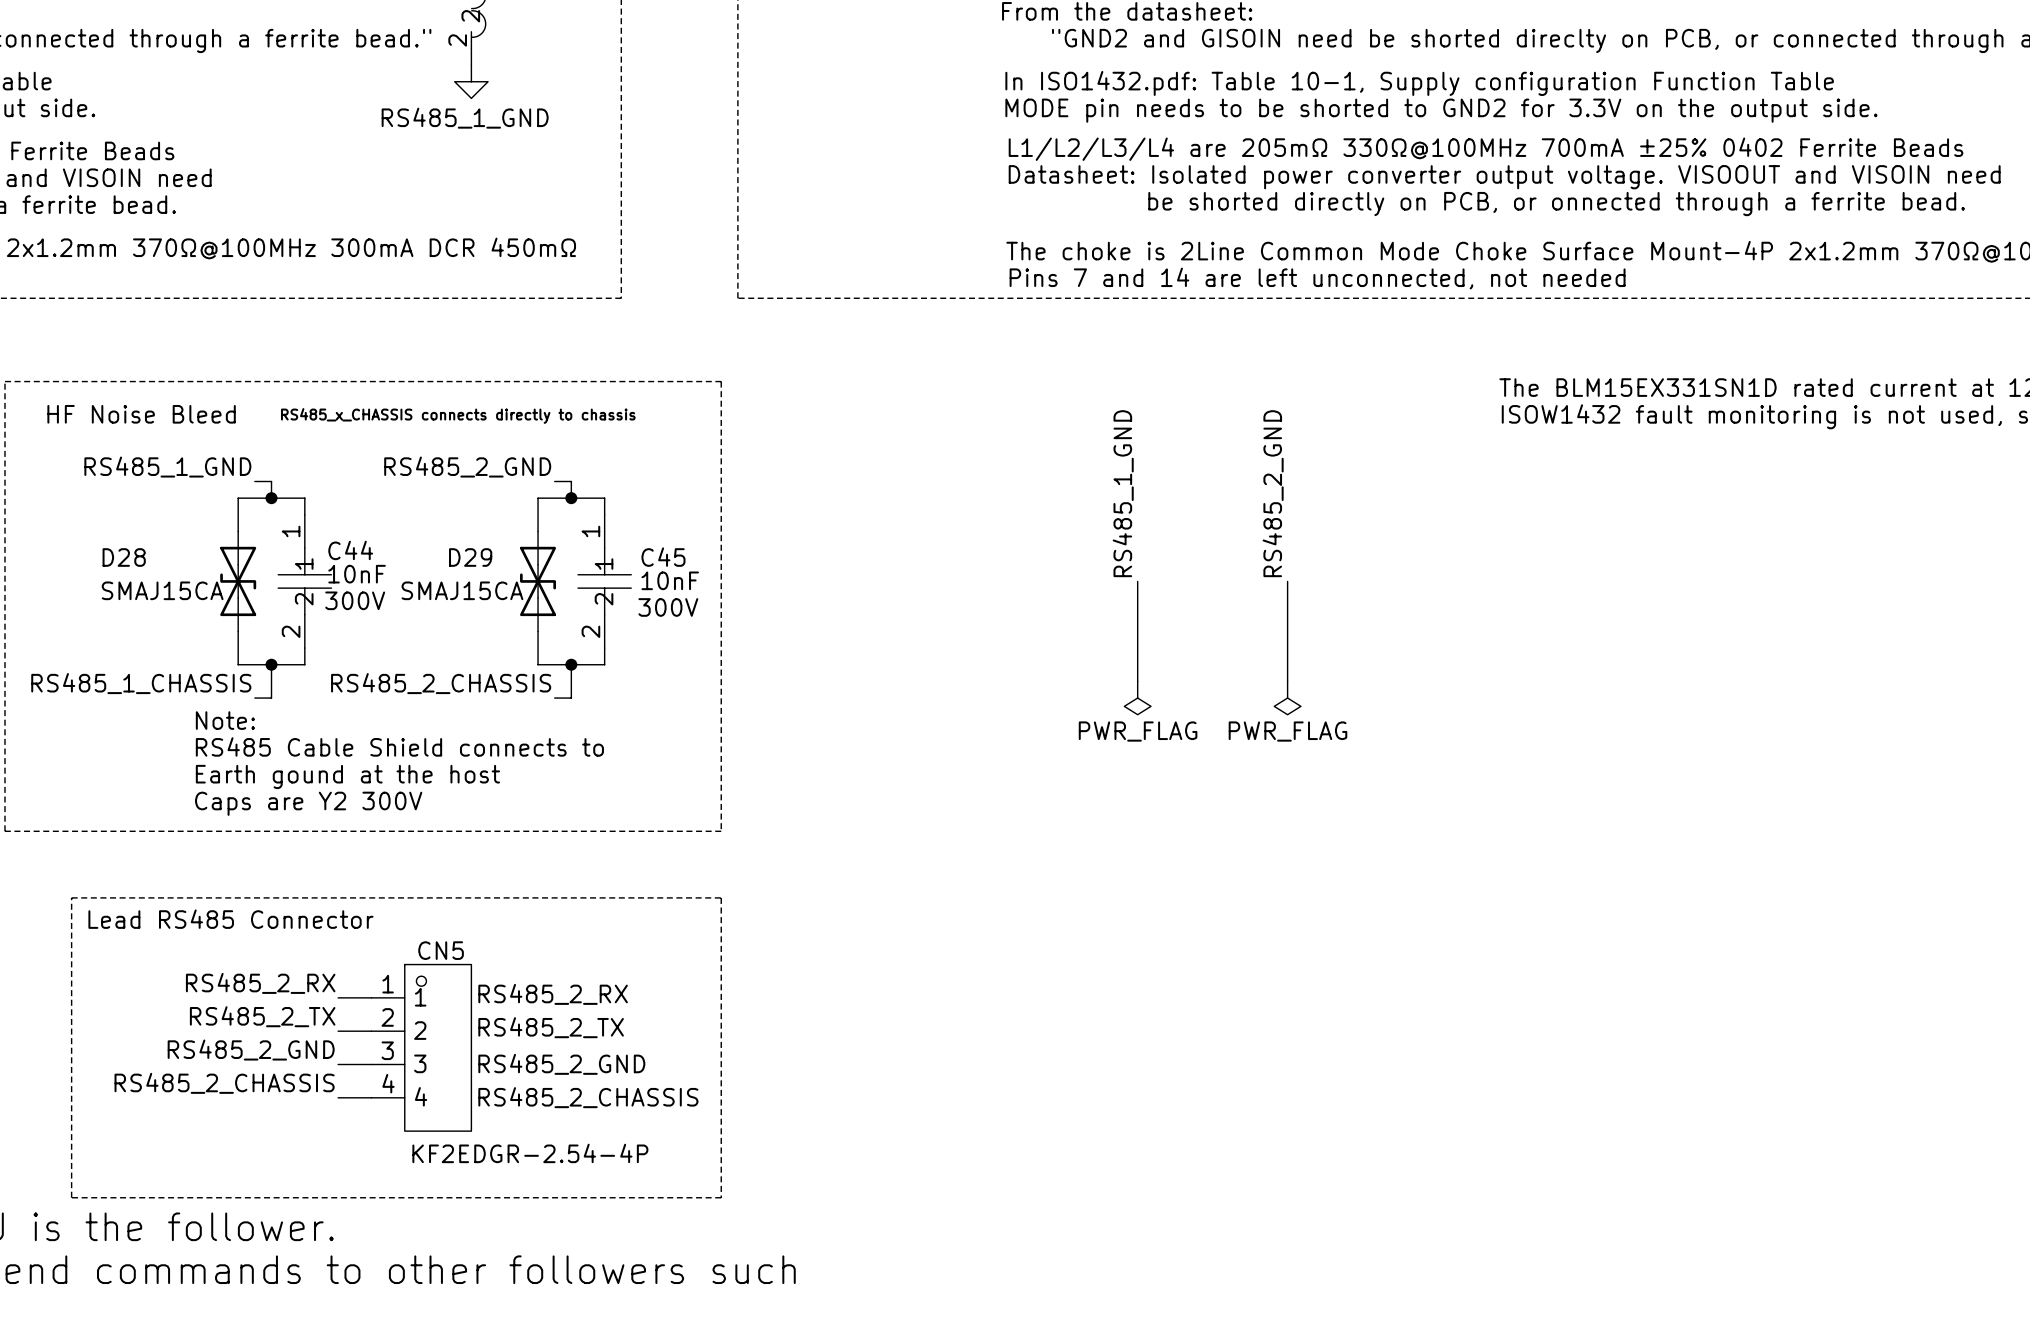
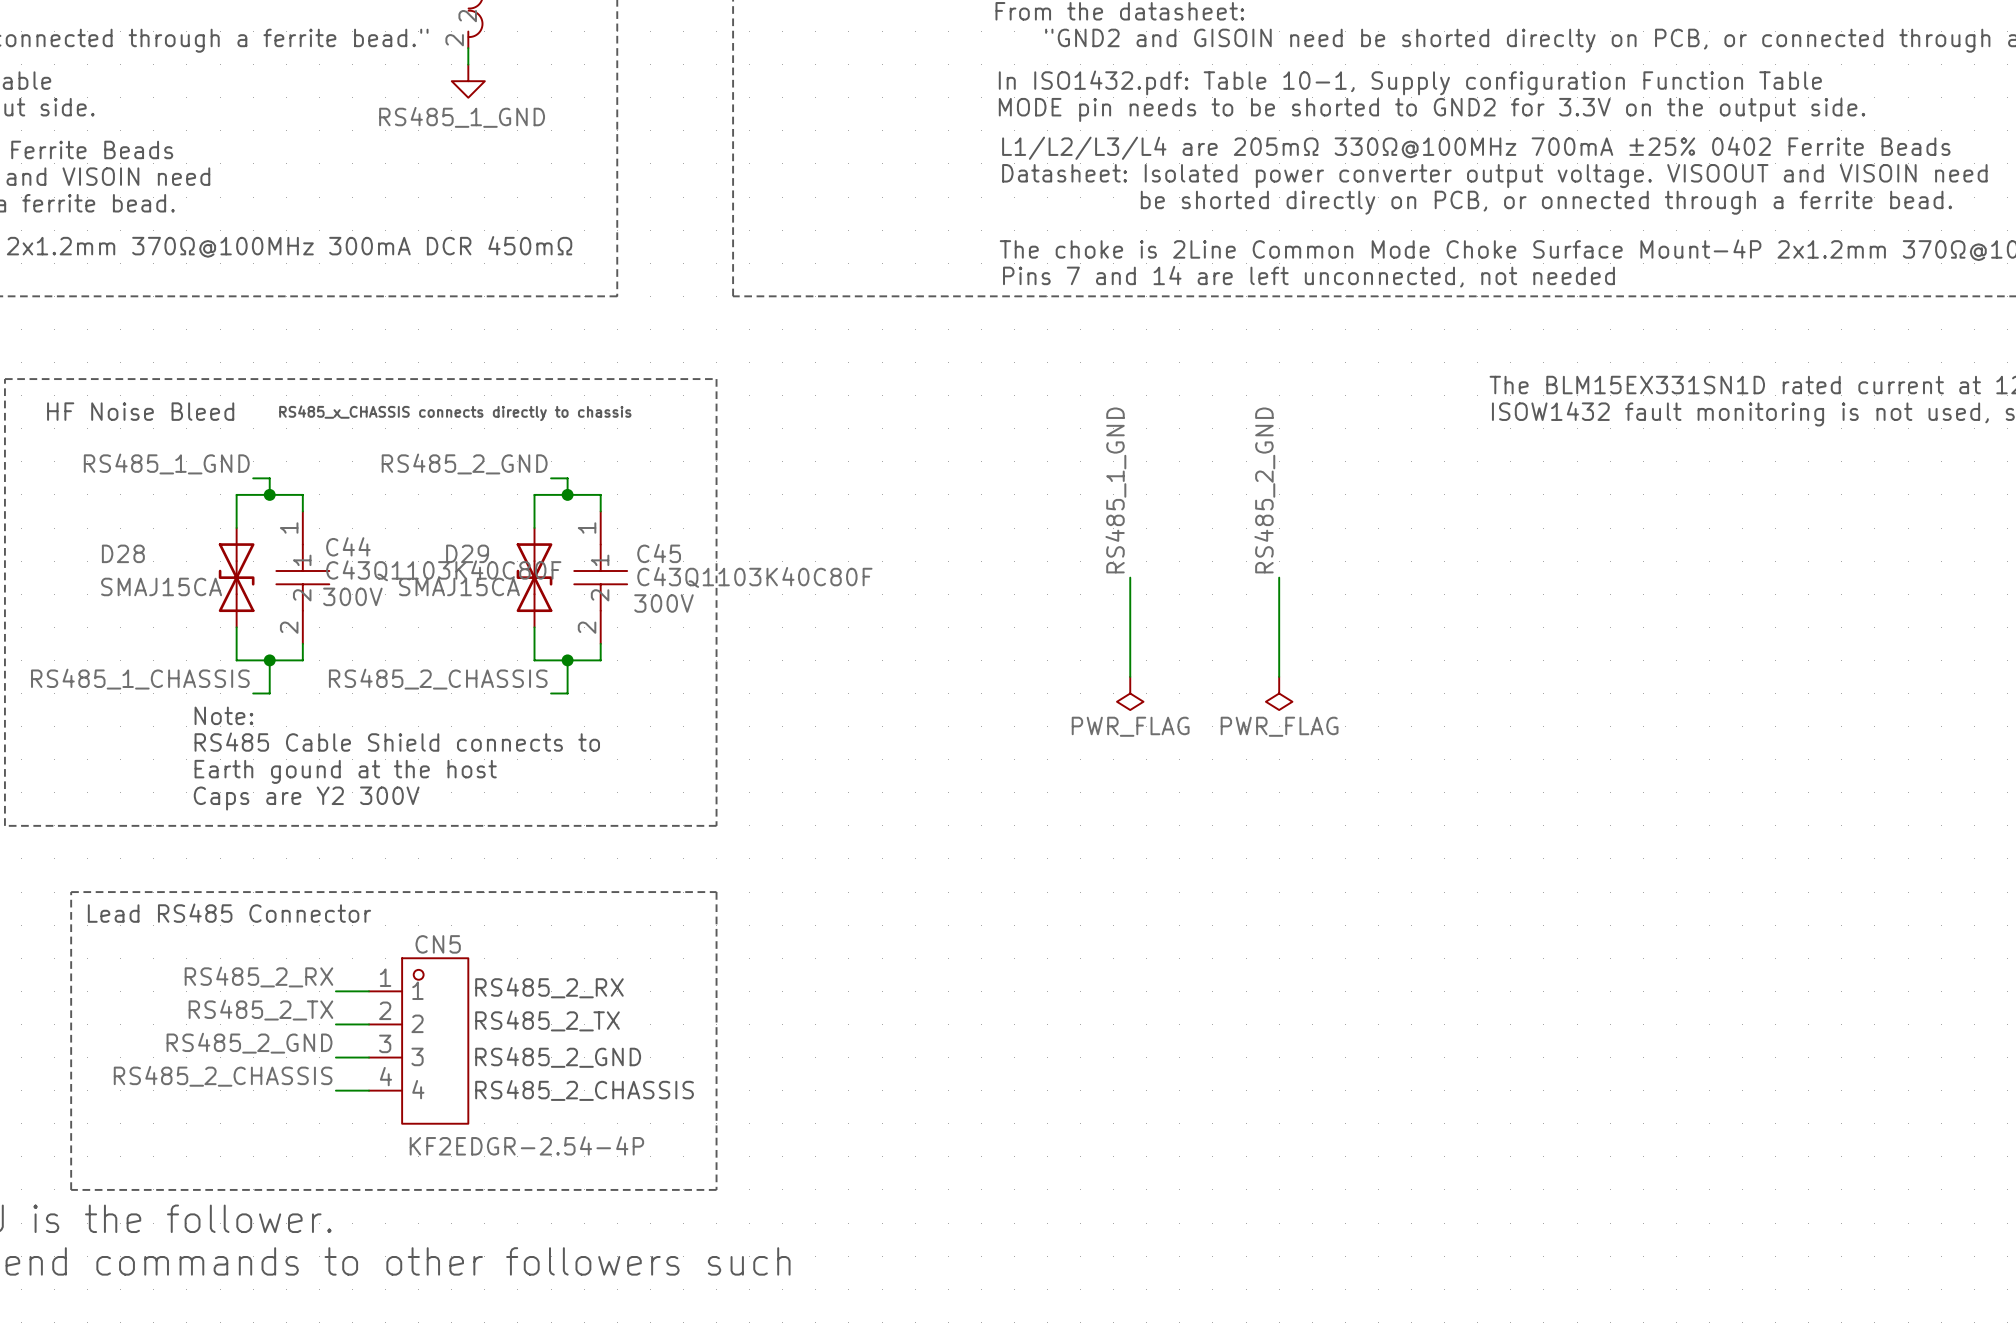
C44 value: 10nF (357, 574) -> C43Q1103K40C80F (443, 570)
C45 value: 10nF (670, 580) -> C43Q1103K40C80F (754, 577)

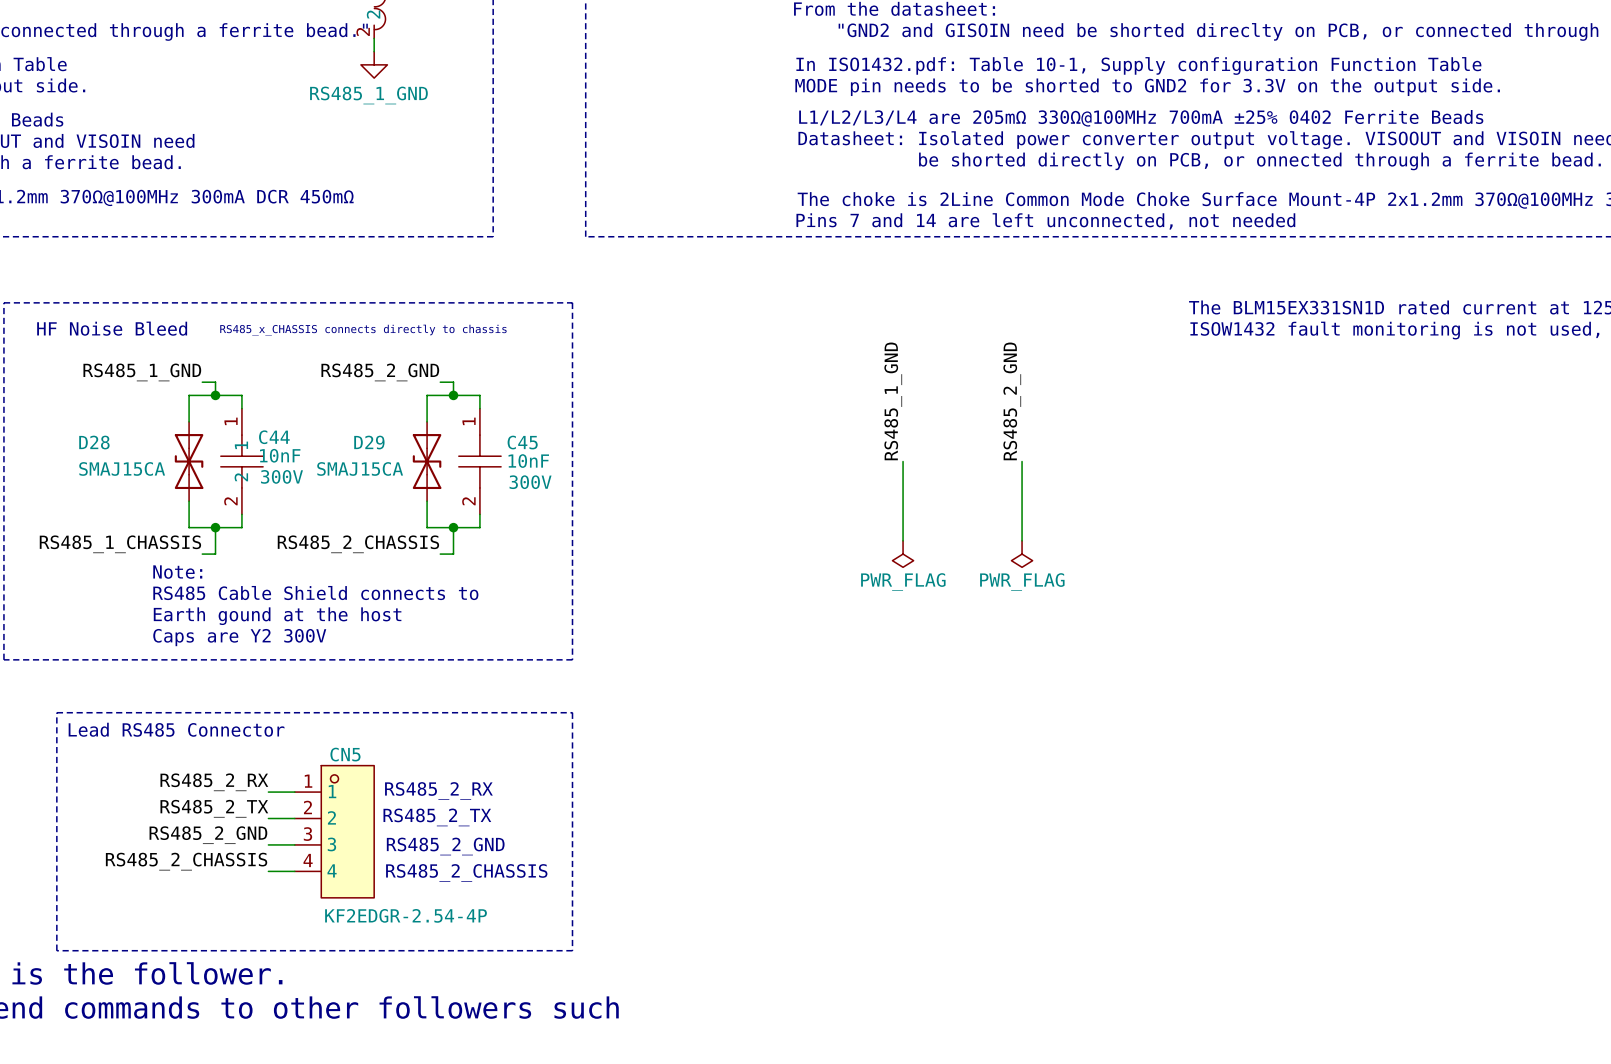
C45 pin name: 1 (600, 560) -> none
C44 value: C43Q1103K40C80F (443, 570) -> 10nF (280, 455)
C45 value: C43Q1103K40C80F (754, 577) -> 10nF (528, 461)
C45 pin name: 2 (600, 595) -> none

